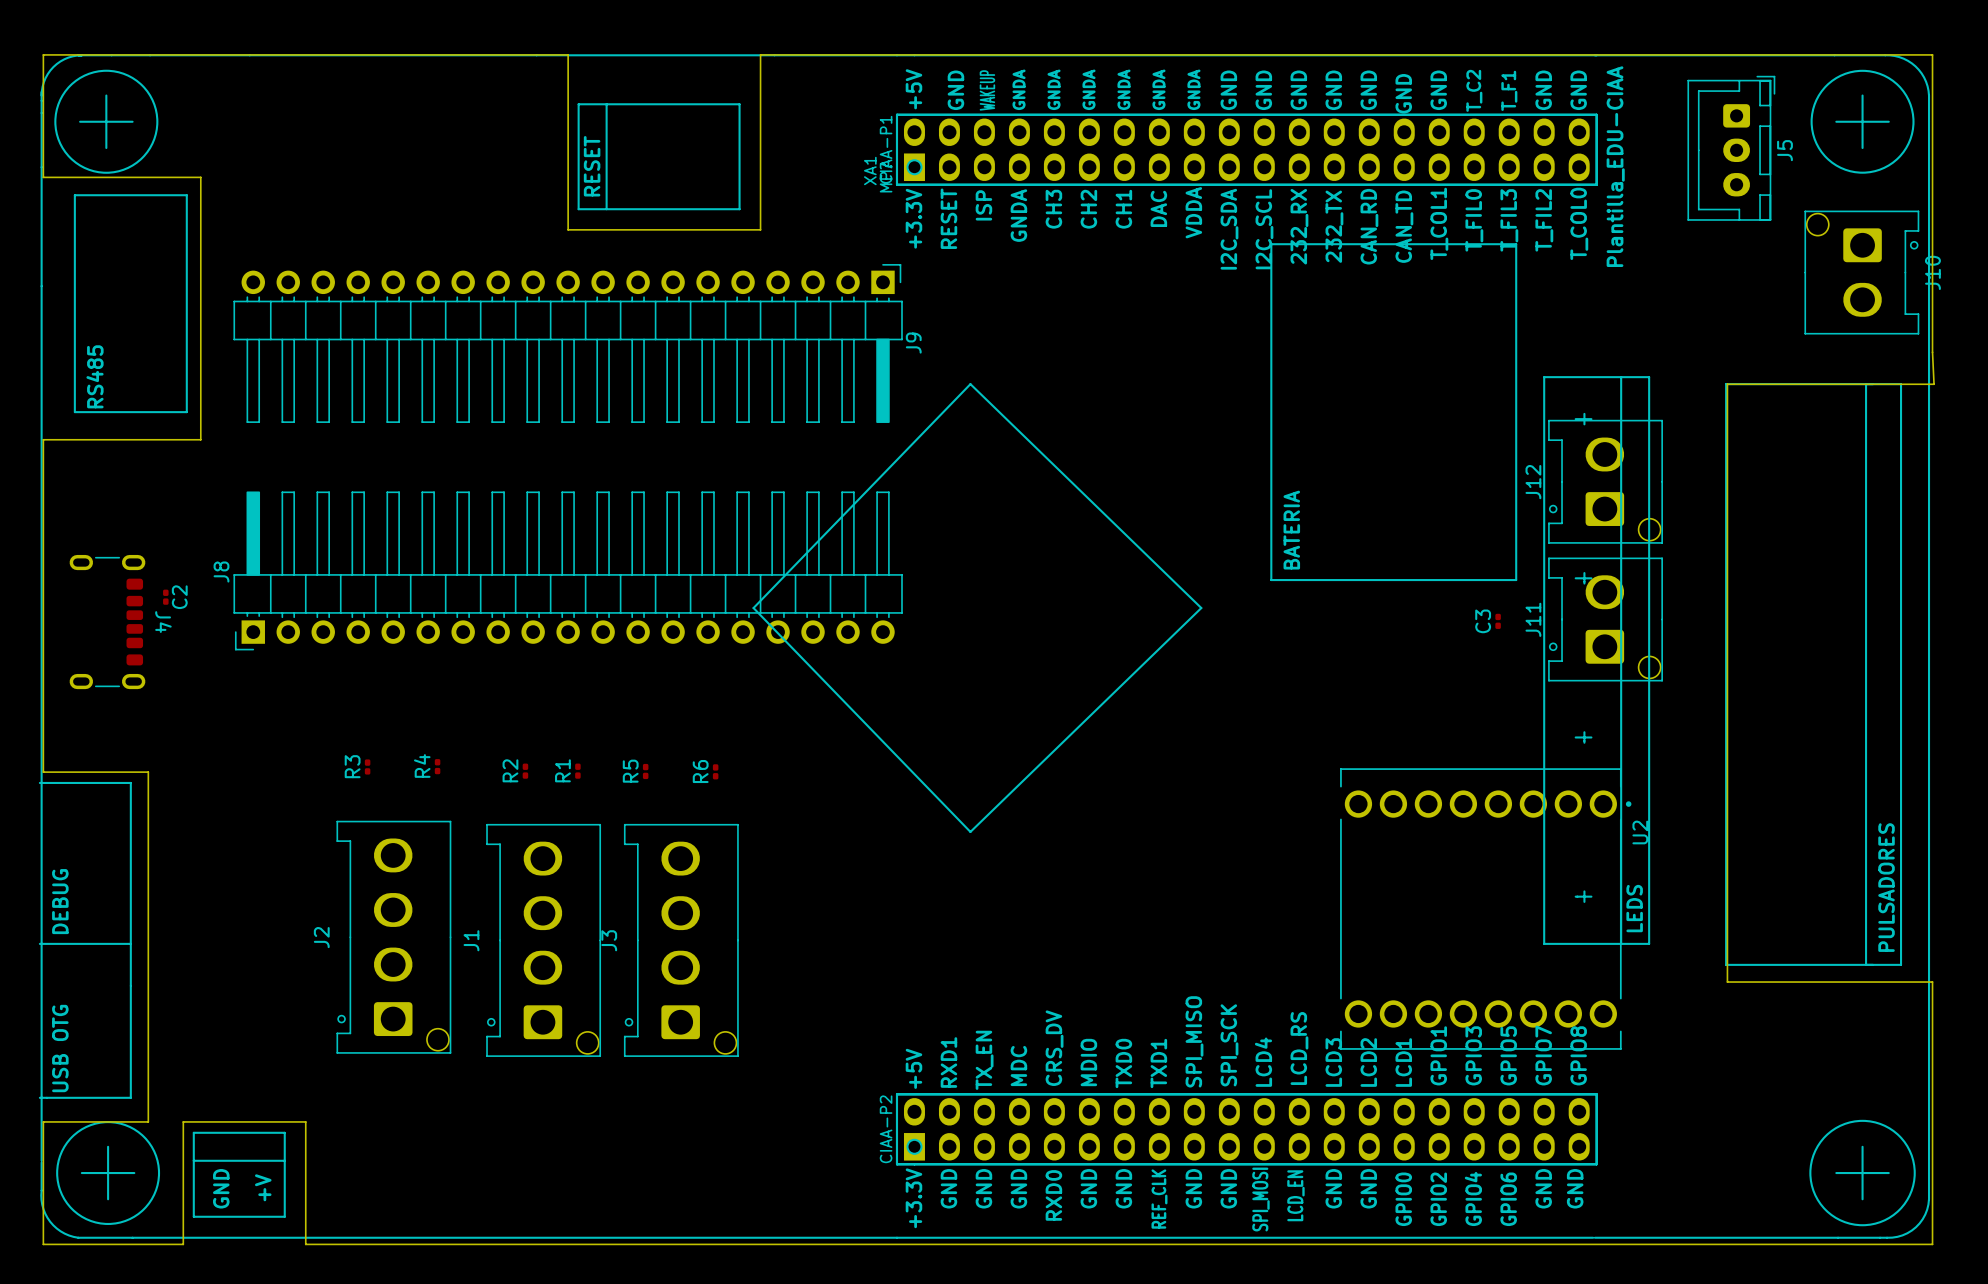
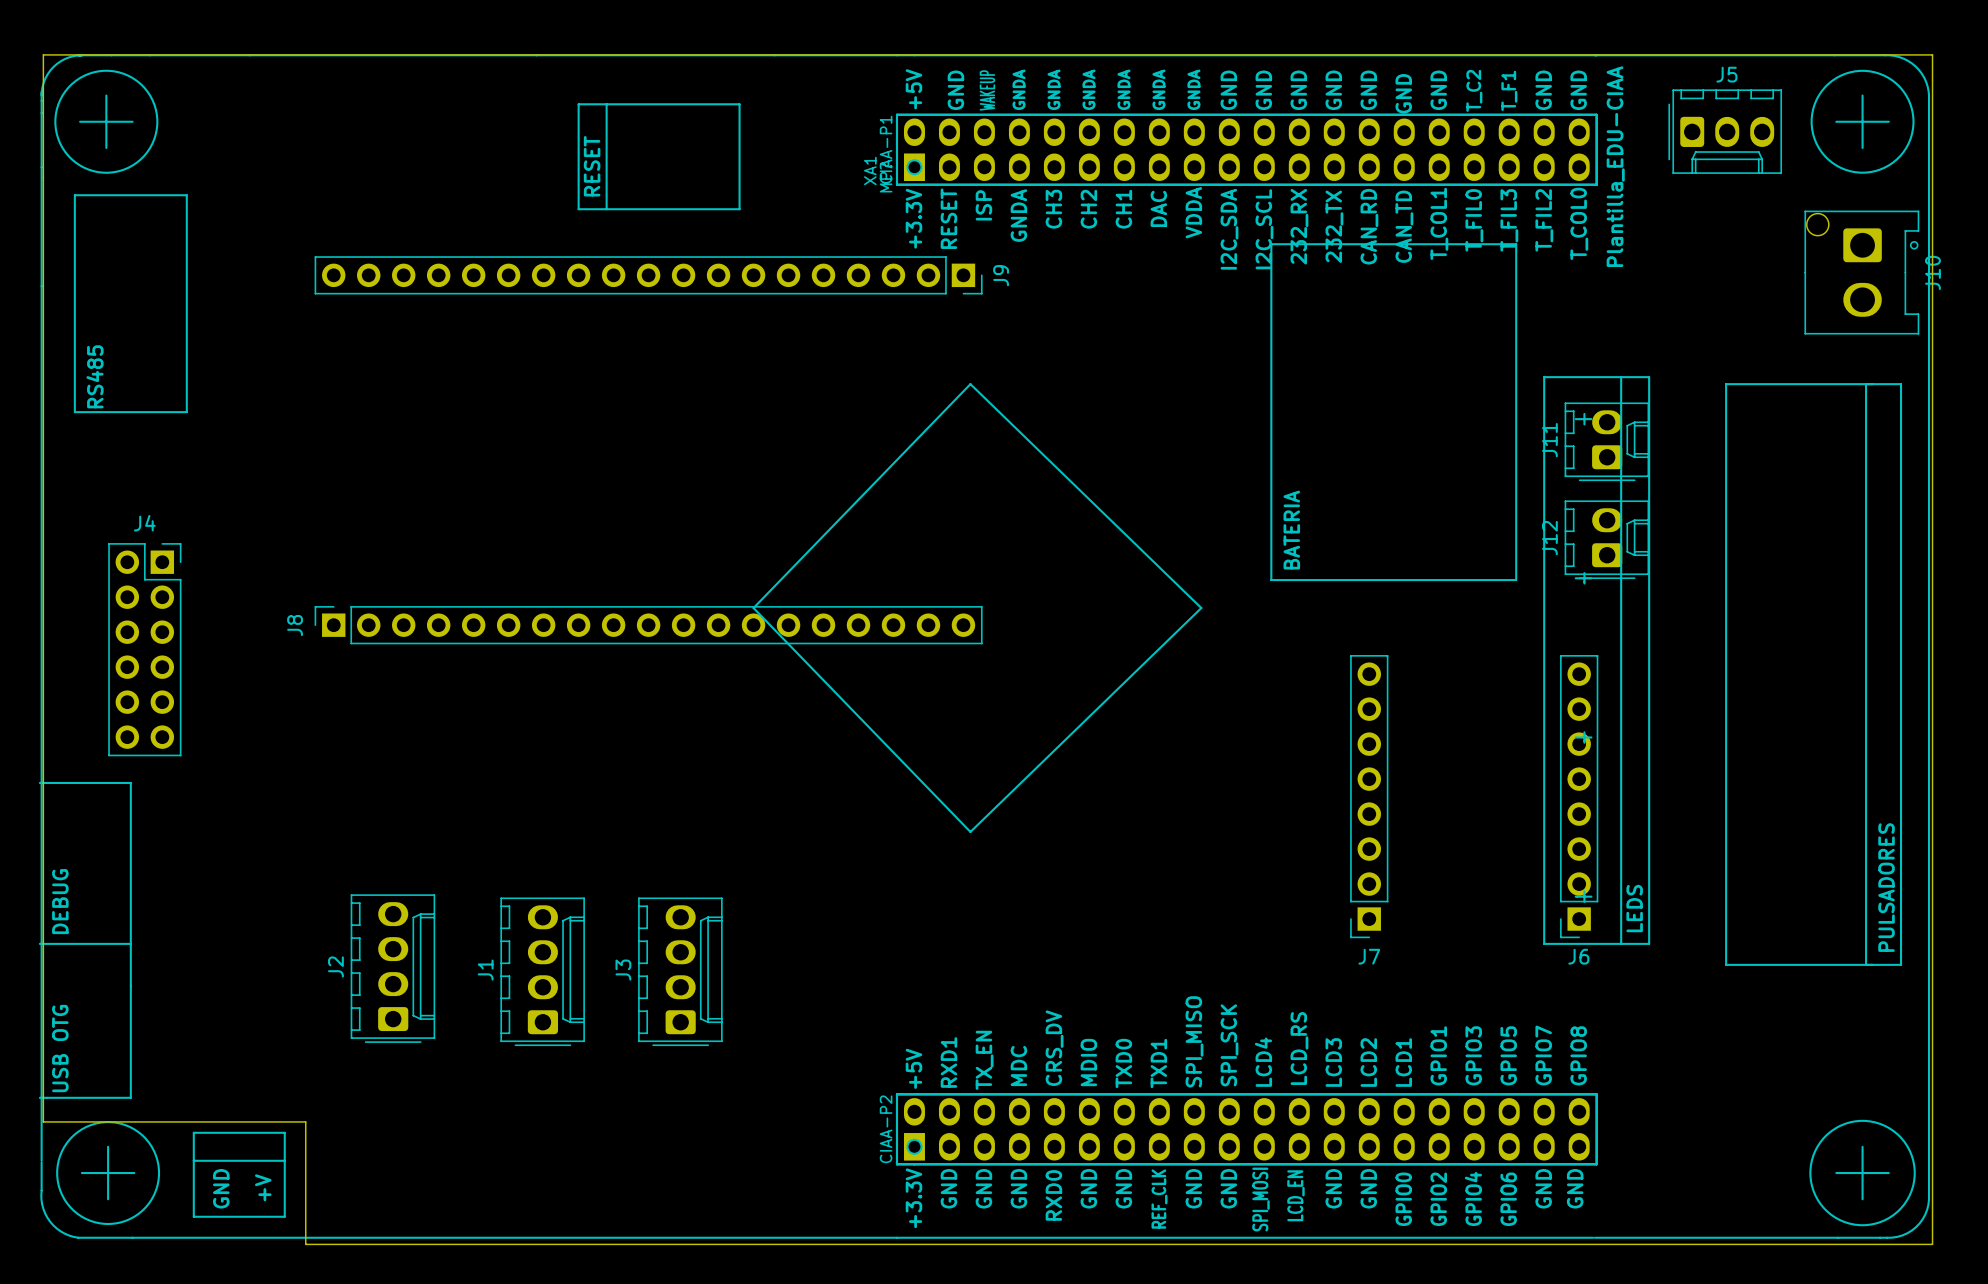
board edge: (568, 54) (568, 229) (760, 229) (760, 54) -> (568, 54) (760, 54)
J5 footprint: [1687, 75, 1776, 221] -> [1668, 89, 1783, 174]
J5 name position: J5 (1784, 150) -> J5 (1726, 74)
board edge: (43, 177) (200, 177) (200, 439) (43, 439) -> (43, 177) (43, 439)
J9 footprint: [233, 264, 903, 423] -> [314, 256, 983, 295]
board edge: (1932, 352) (1934, 384) (1727, 384) (1727, 982) (1932, 982) -> (1932, 352) (1932, 982)
J12 footprint: [1548, 419, 1663, 544] -> [1564, 500, 1650, 580]
J8 footprint: [233, 491, 903, 651] -> [314, 606, 983, 645]
J4 footprint: [69, 554, 146, 690] -> [108, 543, 182, 757]
J11 footprint: [1548, 557, 1663, 682] -> [1564, 402, 1650, 482]
C2: (165, 597) -> none
C3: (1498, 621) -> none
J4 name position: J4 (163, 622) -> J4 (144, 523)
R4: (437, 766) -> none
R3: (367, 767) -> none
R2: (525, 771) -> none
R1: (577, 771) -> none
R5: (645, 771) -> none
R6: (715, 771) -> none
board edge: (43, 772) (148, 772) (148, 1121) -> (43, 772) (43, 1121)
J7: none -> (1369, 796)
J6: none -> (1579, 796)
J2 footprint: [336, 820, 452, 1054] -> [350, 894, 436, 1043]
J1 footprint: [486, 823, 602, 1057] -> [500, 897, 585, 1047]
J3 footprint: [623, 823, 739, 1057] -> [638, 897, 723, 1047]
U2: (1485, 909) -> none
board edge: (43, 1121) (43, 1244) (183, 1244) (183, 1121) -> (148, 1121) (183, 1121)

